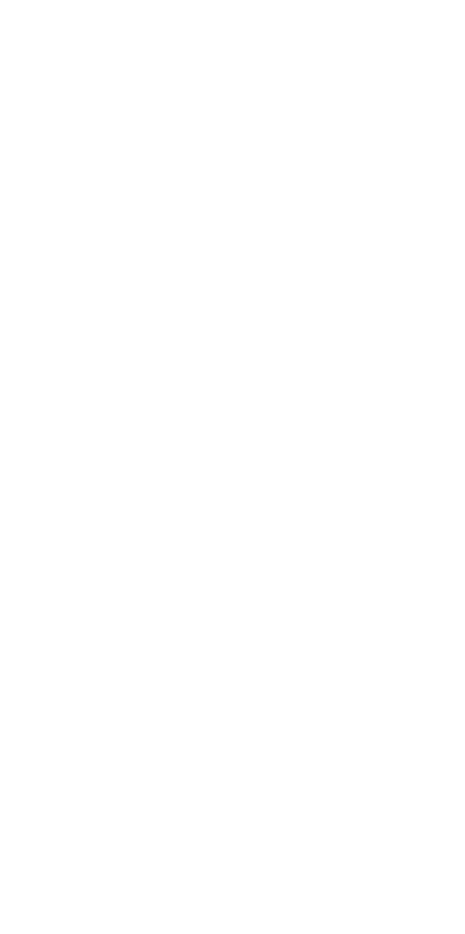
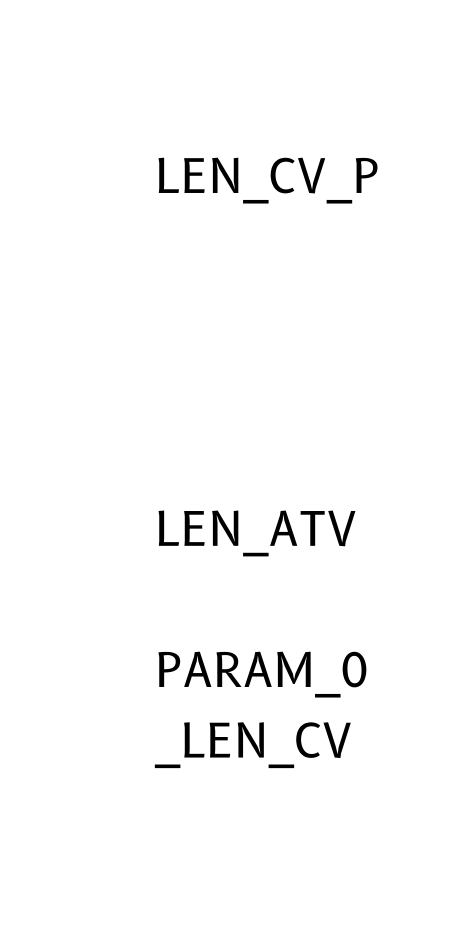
label: none -> LEN_CV_P (268, 180)
label: none -> LEN_ATV (256, 533)
label: none -> PARAM_0 (262, 674)
label: none -> _LEN_CV (252, 745)

